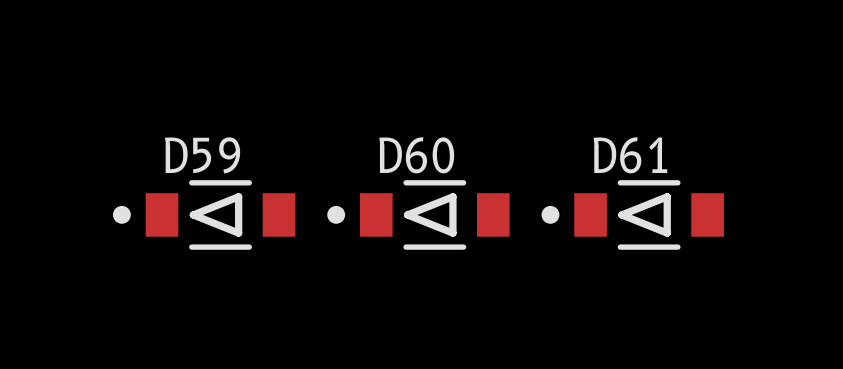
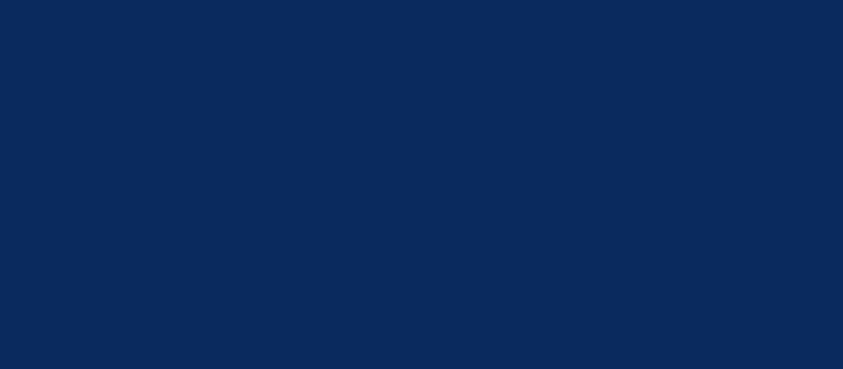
D59: (204, 214) -> none
D60: (418, 214) -> none
D61: (632, 214) -> none

